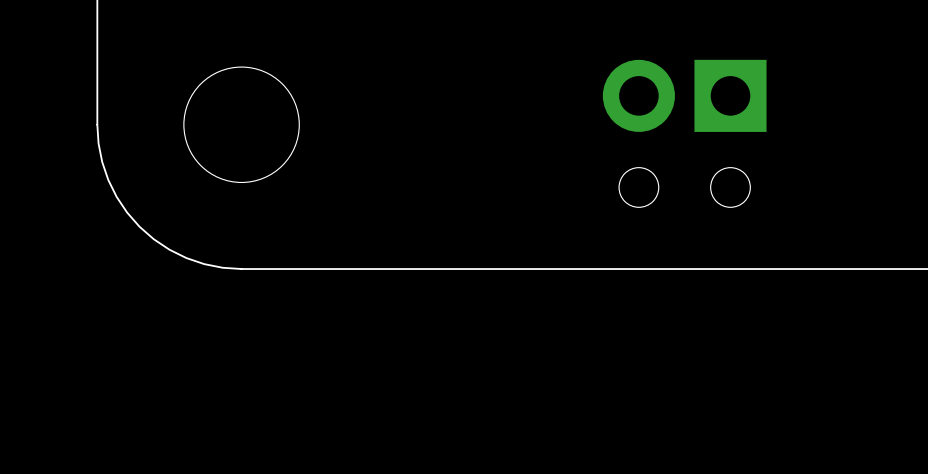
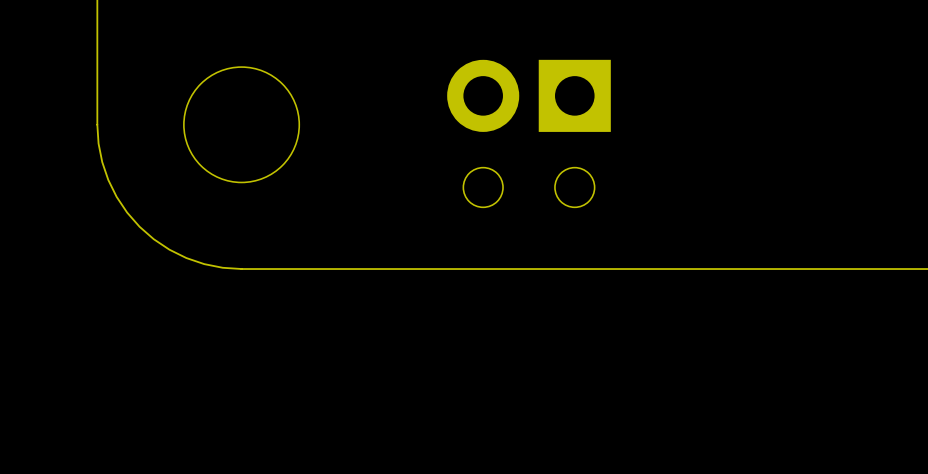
part position: (684, 133) -> (528, 133)

